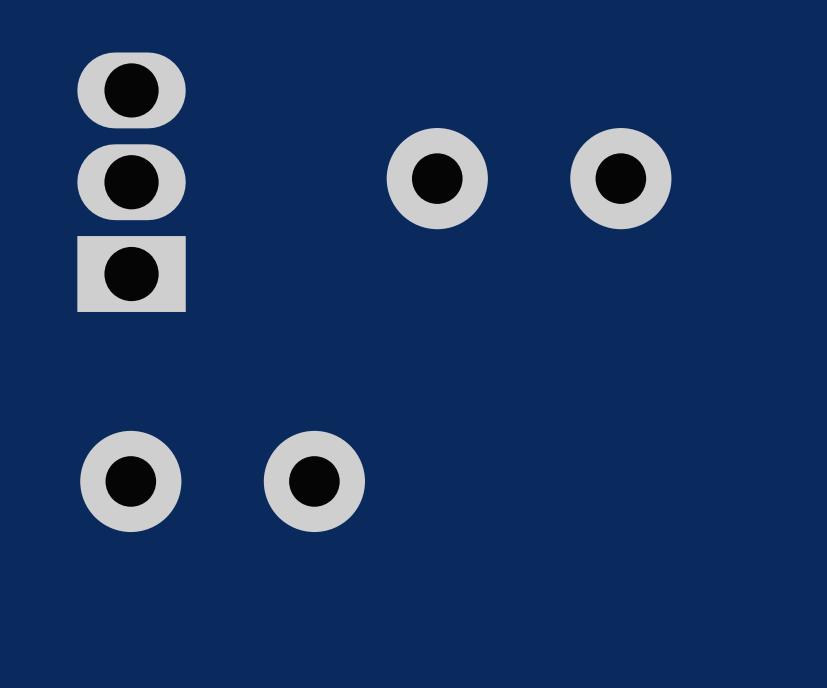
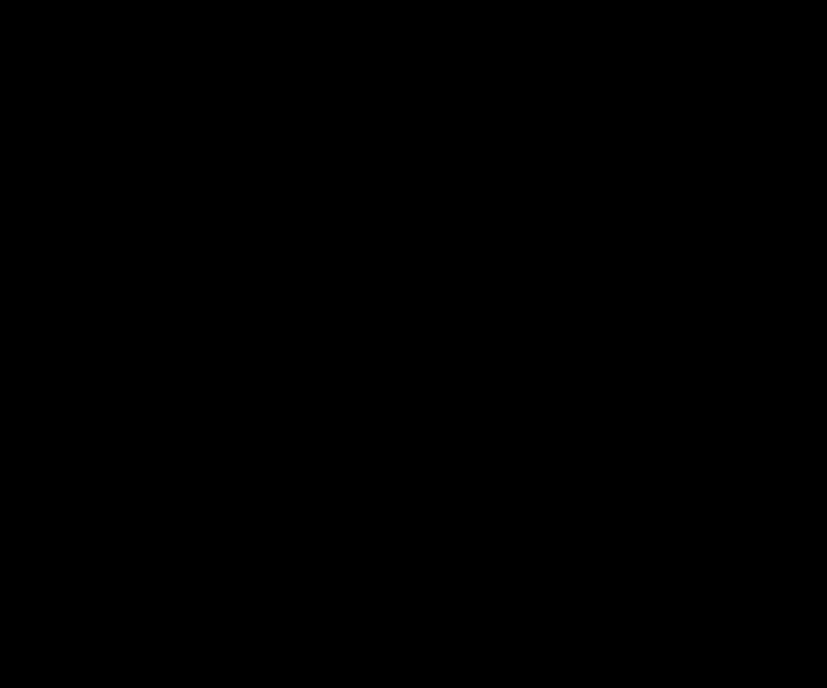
part: (529, 178) -> none
part: (131, 182) -> none
part: (222, 481) -> none

